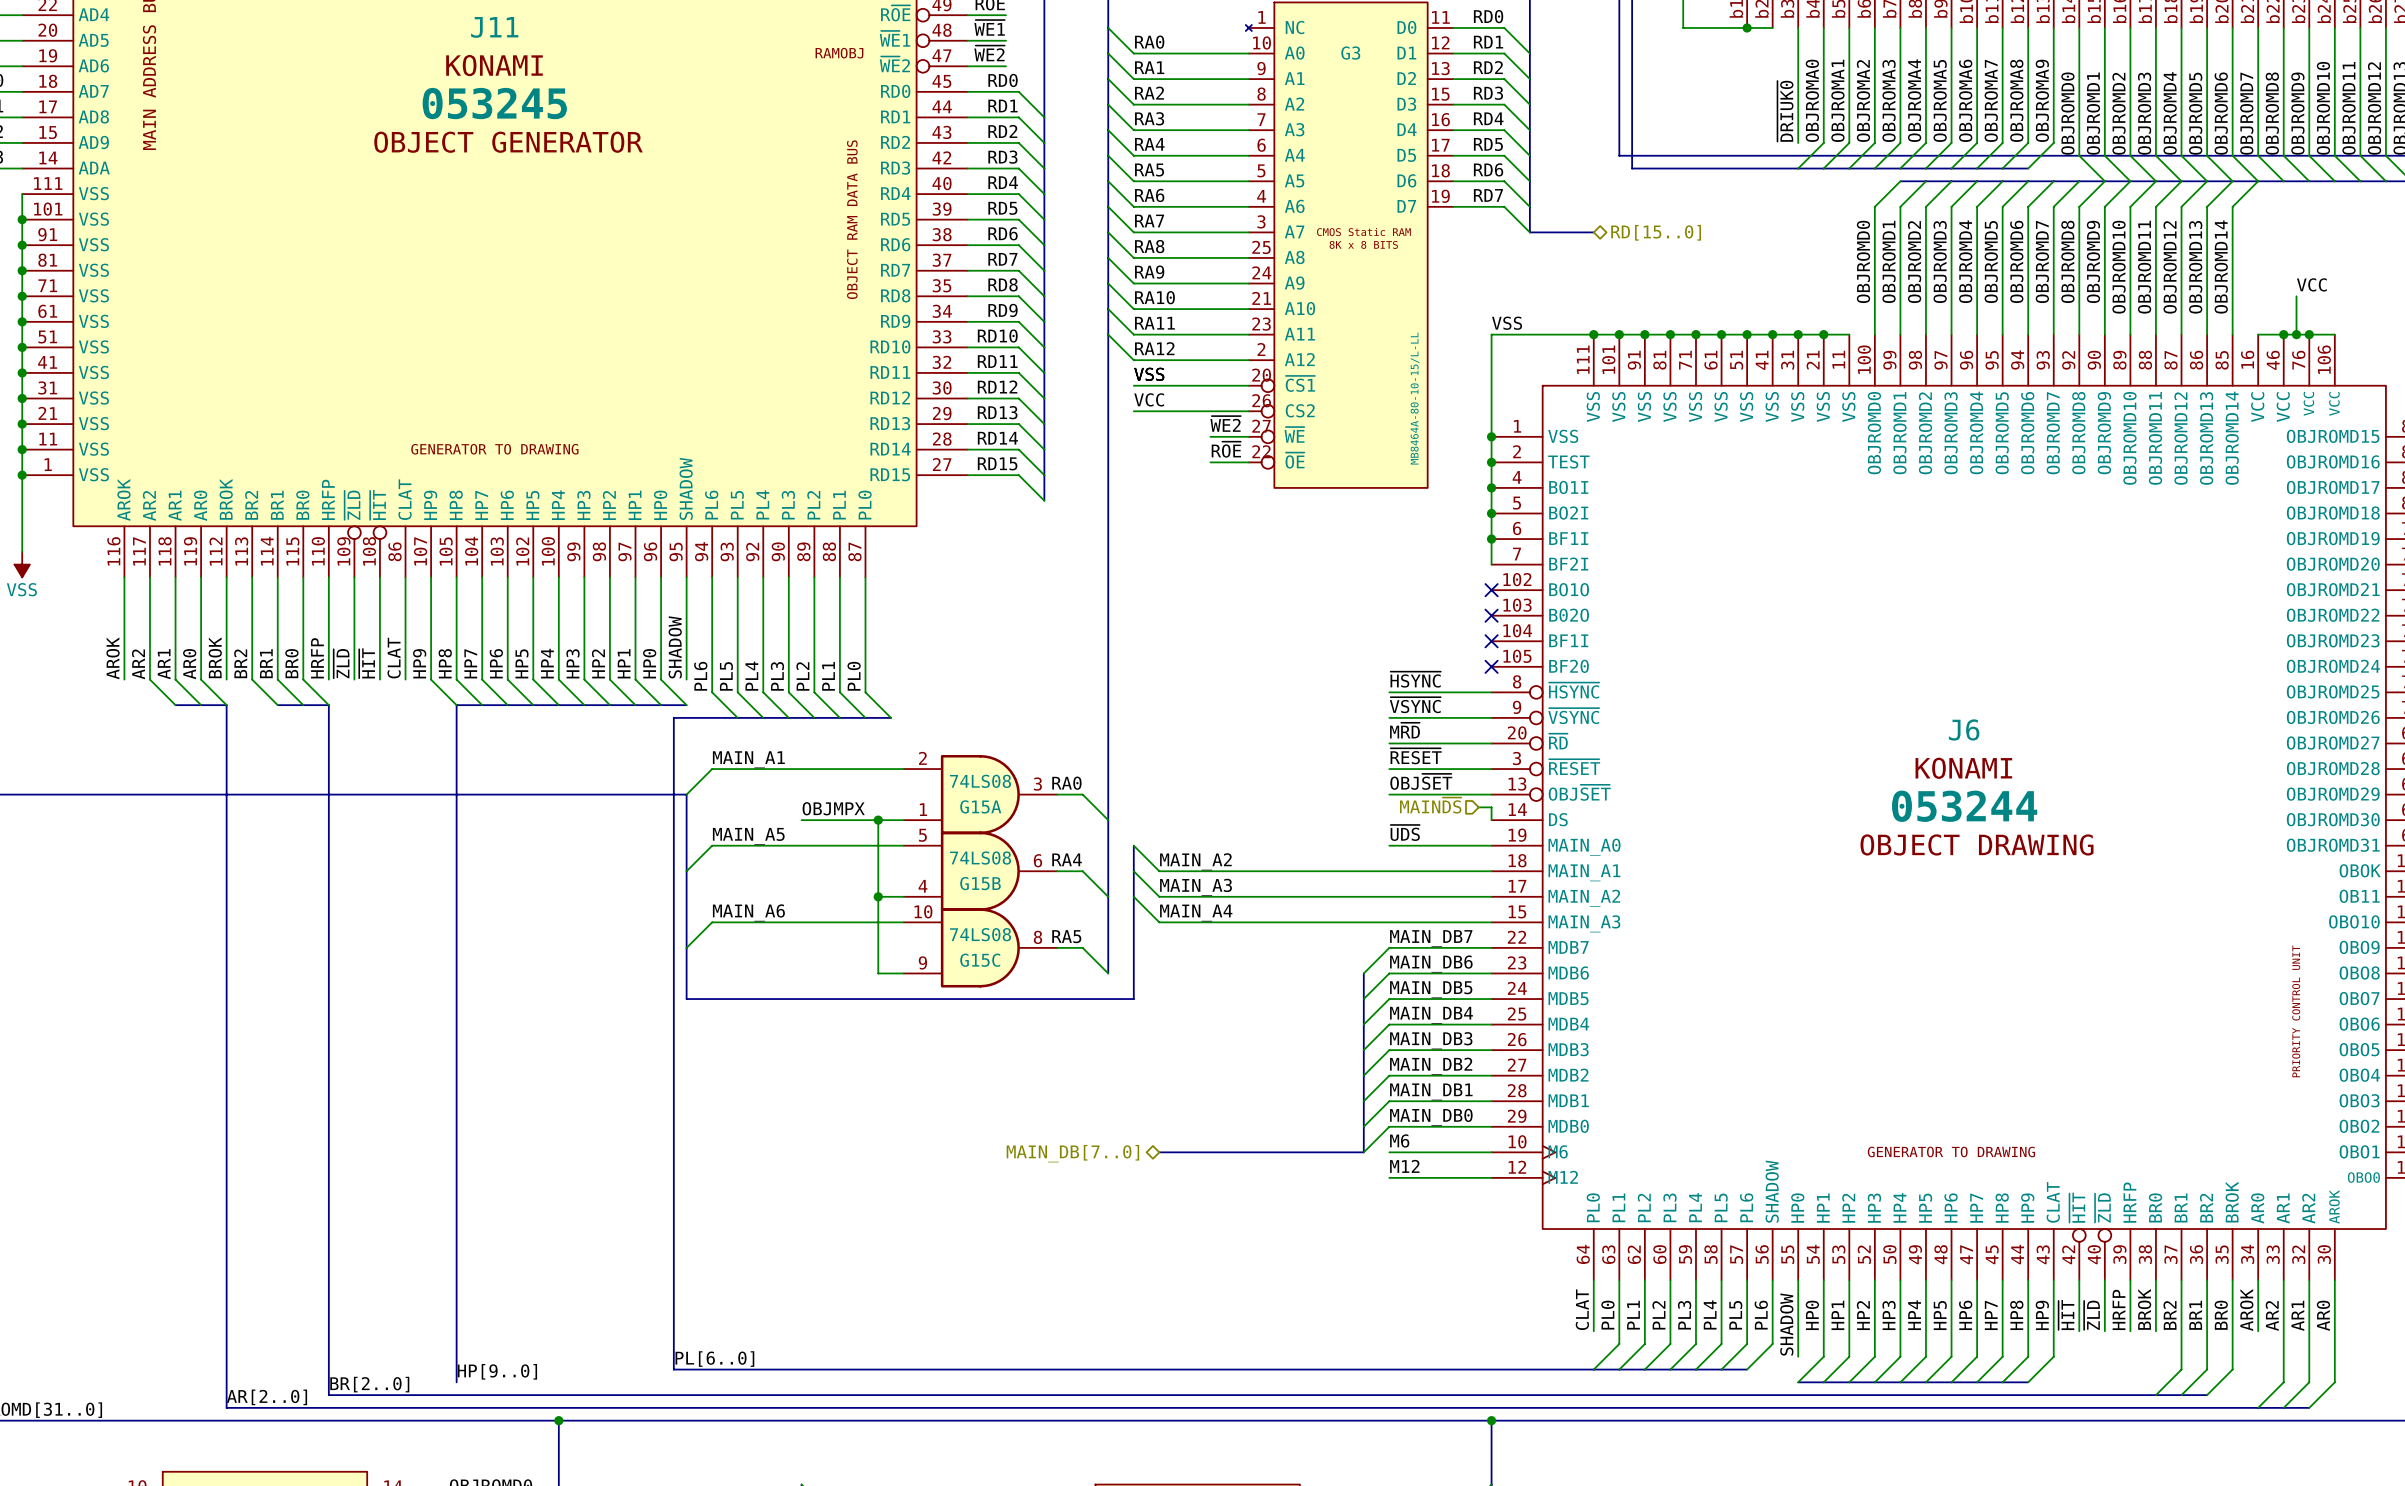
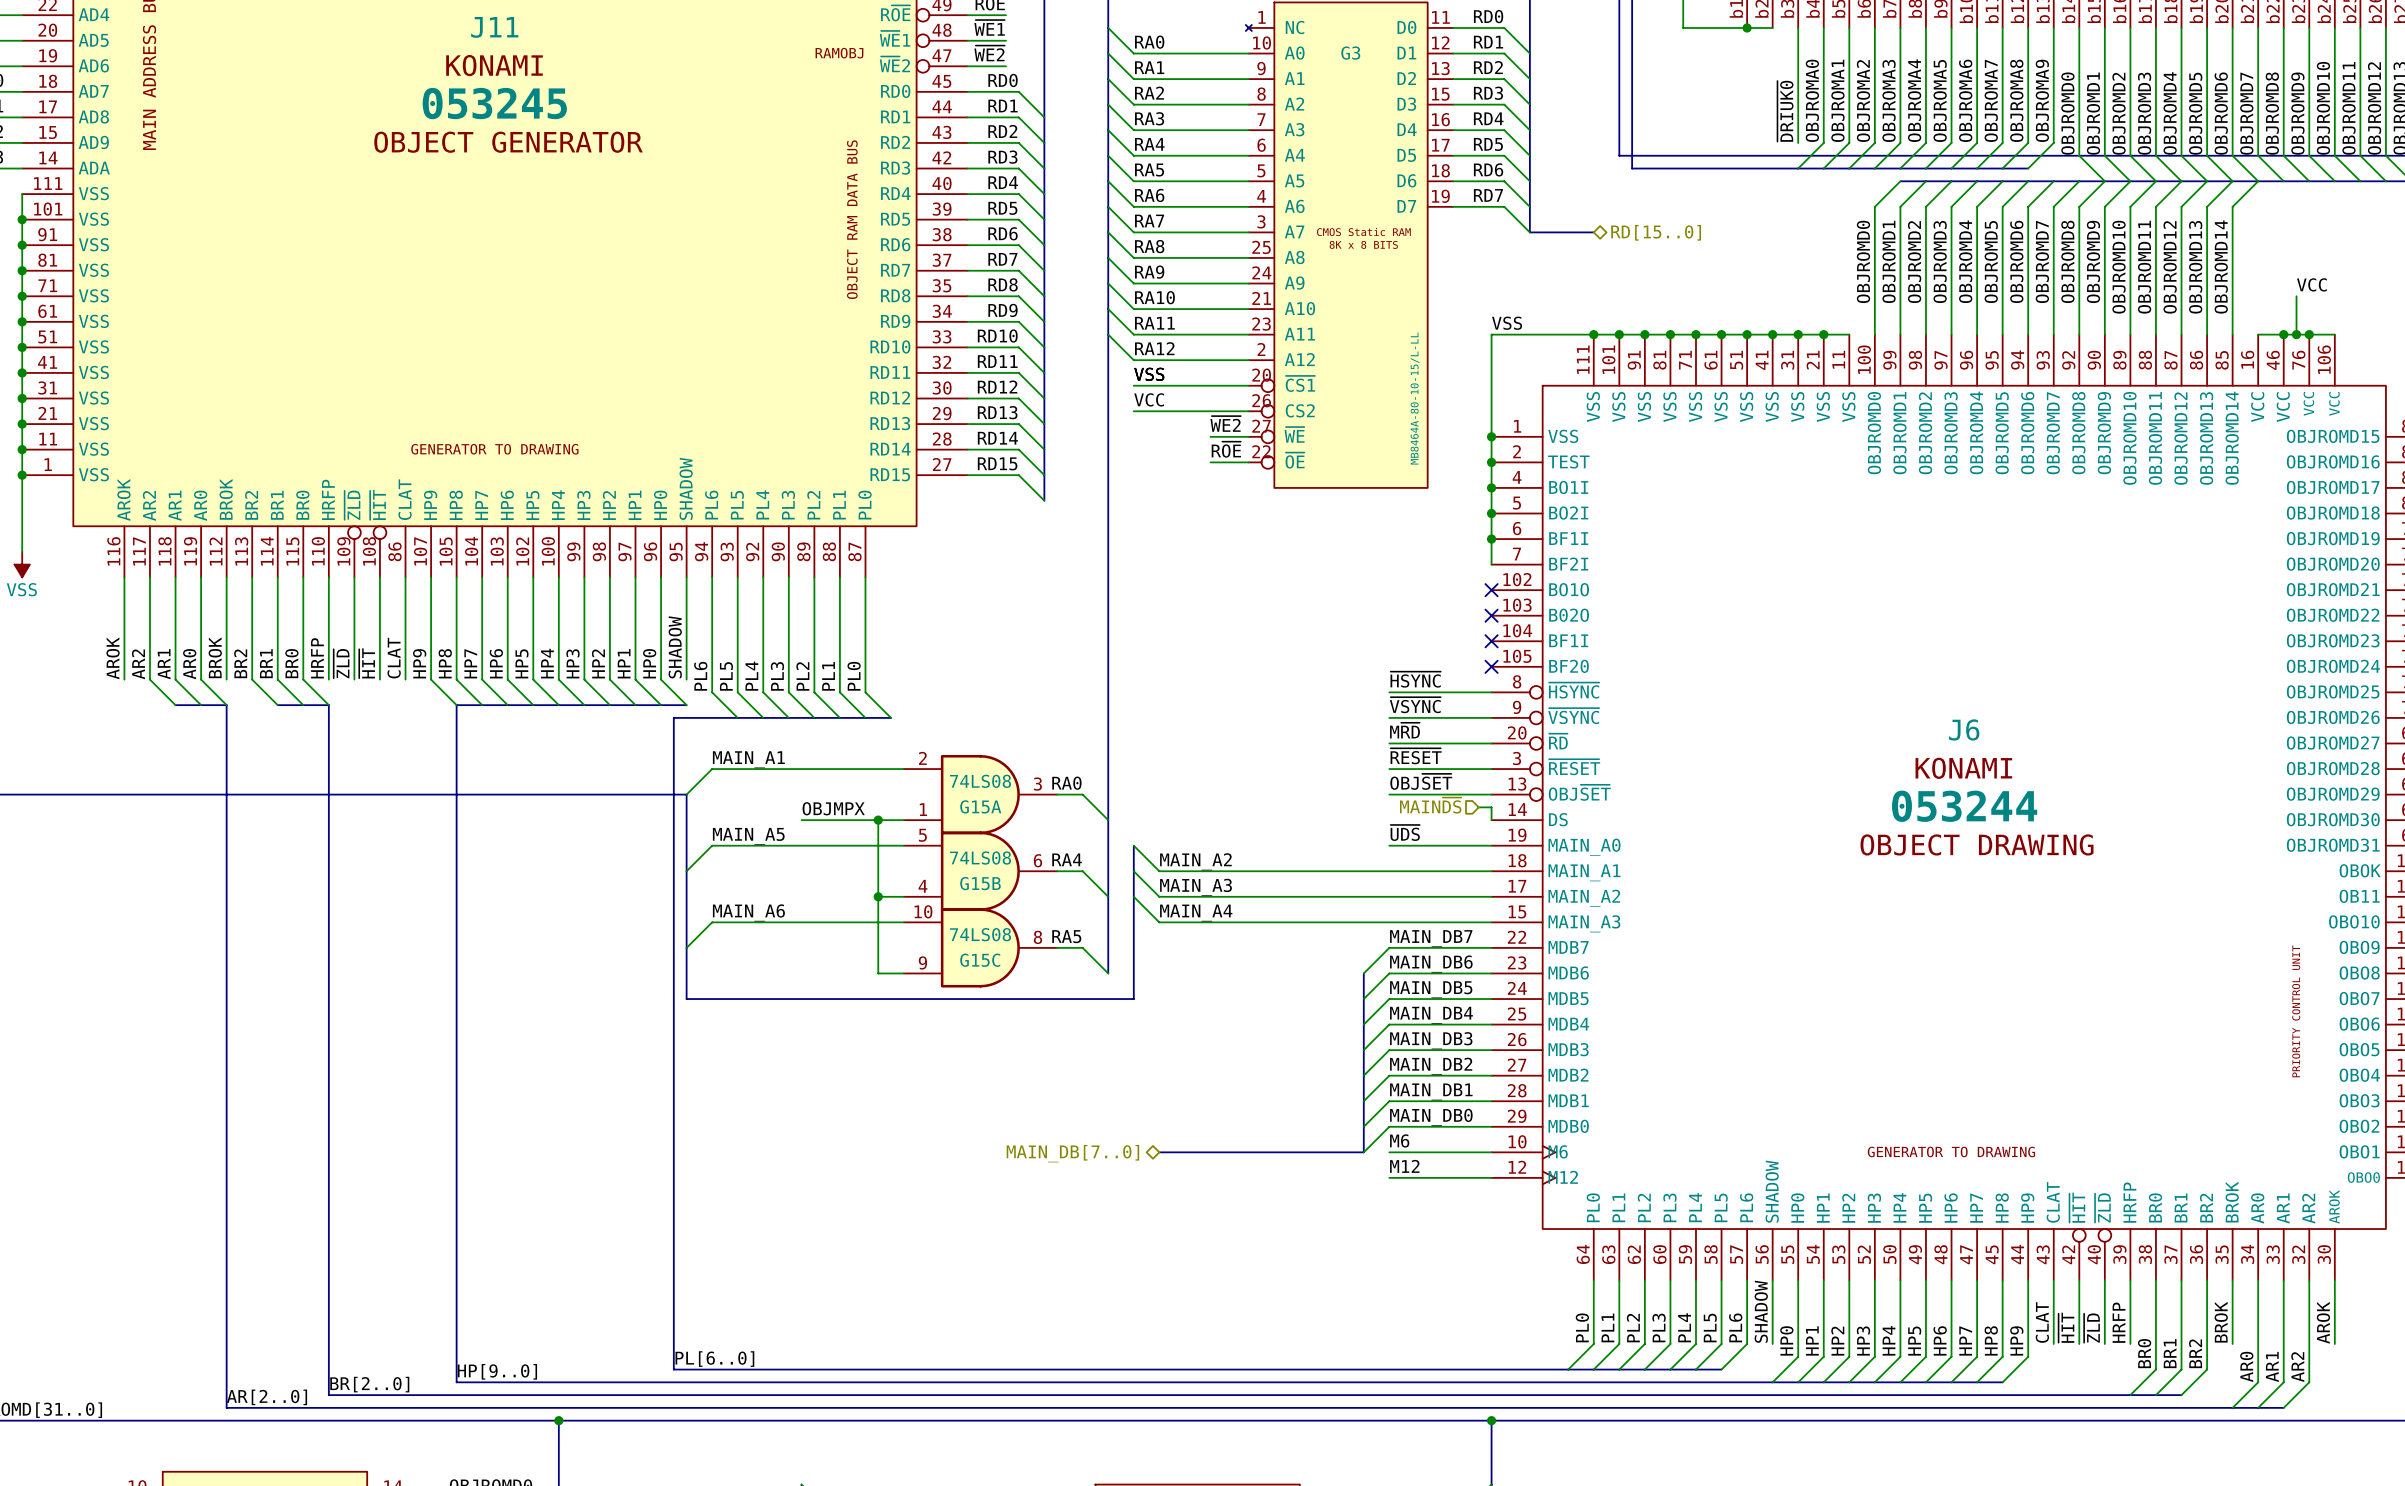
label: CLAT (1582, 1309) -> none
label position: HRFP (2119, 1309) -> HRFP (2119, 1322)
label position: BROK (2144, 1309) -> BROK (2221, 1322)
label position: AROK (2246, 1310) -> AROK (2323, 1322)
label: none -> SHADOW (1761, 1311)
label position: PL4 (1710, 1314) -> PL4 (1684, 1327)
label position: PL0 (1607, 1315) -> PL0 (1582, 1327)
label position: PL1 (1633, 1315) -> PL1 (1607, 1327)
label position: PL2 (1658, 1315) -> PL2 (1633, 1328)
label position: PL3 (1684, 1315) -> PL3 (1659, 1327)
label position: PL5 (1735, 1315) -> PL5 (1710, 1328)
label position: PL6 (1761, 1315) -> PL6 (1735, 1327)
label: HP0 (1812, 1315) -> none
label position: HP1 (1837, 1315) -> HP1 (1812, 1340)
label position: HP2 (1863, 1315) -> HP2 (1837, 1341)
label position: HP3 (1889, 1315) -> HP3 (1863, 1341)
label position: HP4 (1914, 1315) -> HP4 (1889, 1340)
label position: HP5 (1940, 1315) -> HP5 (1914, 1341)
label position: HP6 (1965, 1315) -> HP6 (1940, 1340)
label position: HP7 (1991, 1315) -> HP7 (1965, 1341)
label position: HP8 (2016, 1315) -> HP8 (1991, 1340)
label position: HP9 (2042, 1315) -> HP9 (2016, 1340)
label position: ~{HIT} (2066, 1315) -> ~{HIT} (2066, 1327)
label position: ~{ZLD} (2091, 1315) -> ~{ZLD} (2091, 1328)
label position: BR2 (2170, 1315) -> BR2 (2195, 1353)
label position: BR1 (2195, 1315) -> BR1 (2170, 1353)
label position: BR0 (2221, 1315) -> BR0 (2144, 1353)
label position: AR2 (2272, 1315) -> AR2 (2297, 1367)
label position: AR1 (2297, 1315) -> AR1 (2272, 1366)
label position: AR0 (2323, 1315) -> AR0 (2246, 1366)
label: none -> CLAT (2042, 1322)
label: SHADOW (1786, 1324) -> HP0 (1786, 1340)
wire: none -> (1593, 1331) (1593, 1344) (1568, 1369)
wire: none -> (2079, 1331) (2079, 1344)
wire: none -> (2104, 1331) (2104, 1344)
wire: none -> (2130, 1331) (2130, 1344)
wire: none -> (2258, 1331) (2258, 1382) (2232, 1407)
wire: (1772, 1344) (1747, 1369) -> (1798, 1356) (1772, 1382)
wire: (2053, 1344) (2053, 1356) (2028, 1382) -> none
wire: (2232, 1344) (2232, 1369) (2207, 1395) -> none
wire: (2334, 1344) (2334, 1382) (2309, 1407) -> (2155, 1331) (2155, 1369) (2130, 1395)
bus: (1721, 1369) (1747, 1369) -> none
bus: none -> (456, 1382) (1798, 1382)
bus: (2002, 1382) (2028, 1382) -> none
bus: (2181, 1395) (2207, 1395) -> none
bus: (2283, 1407) (2309, 1407) -> none

